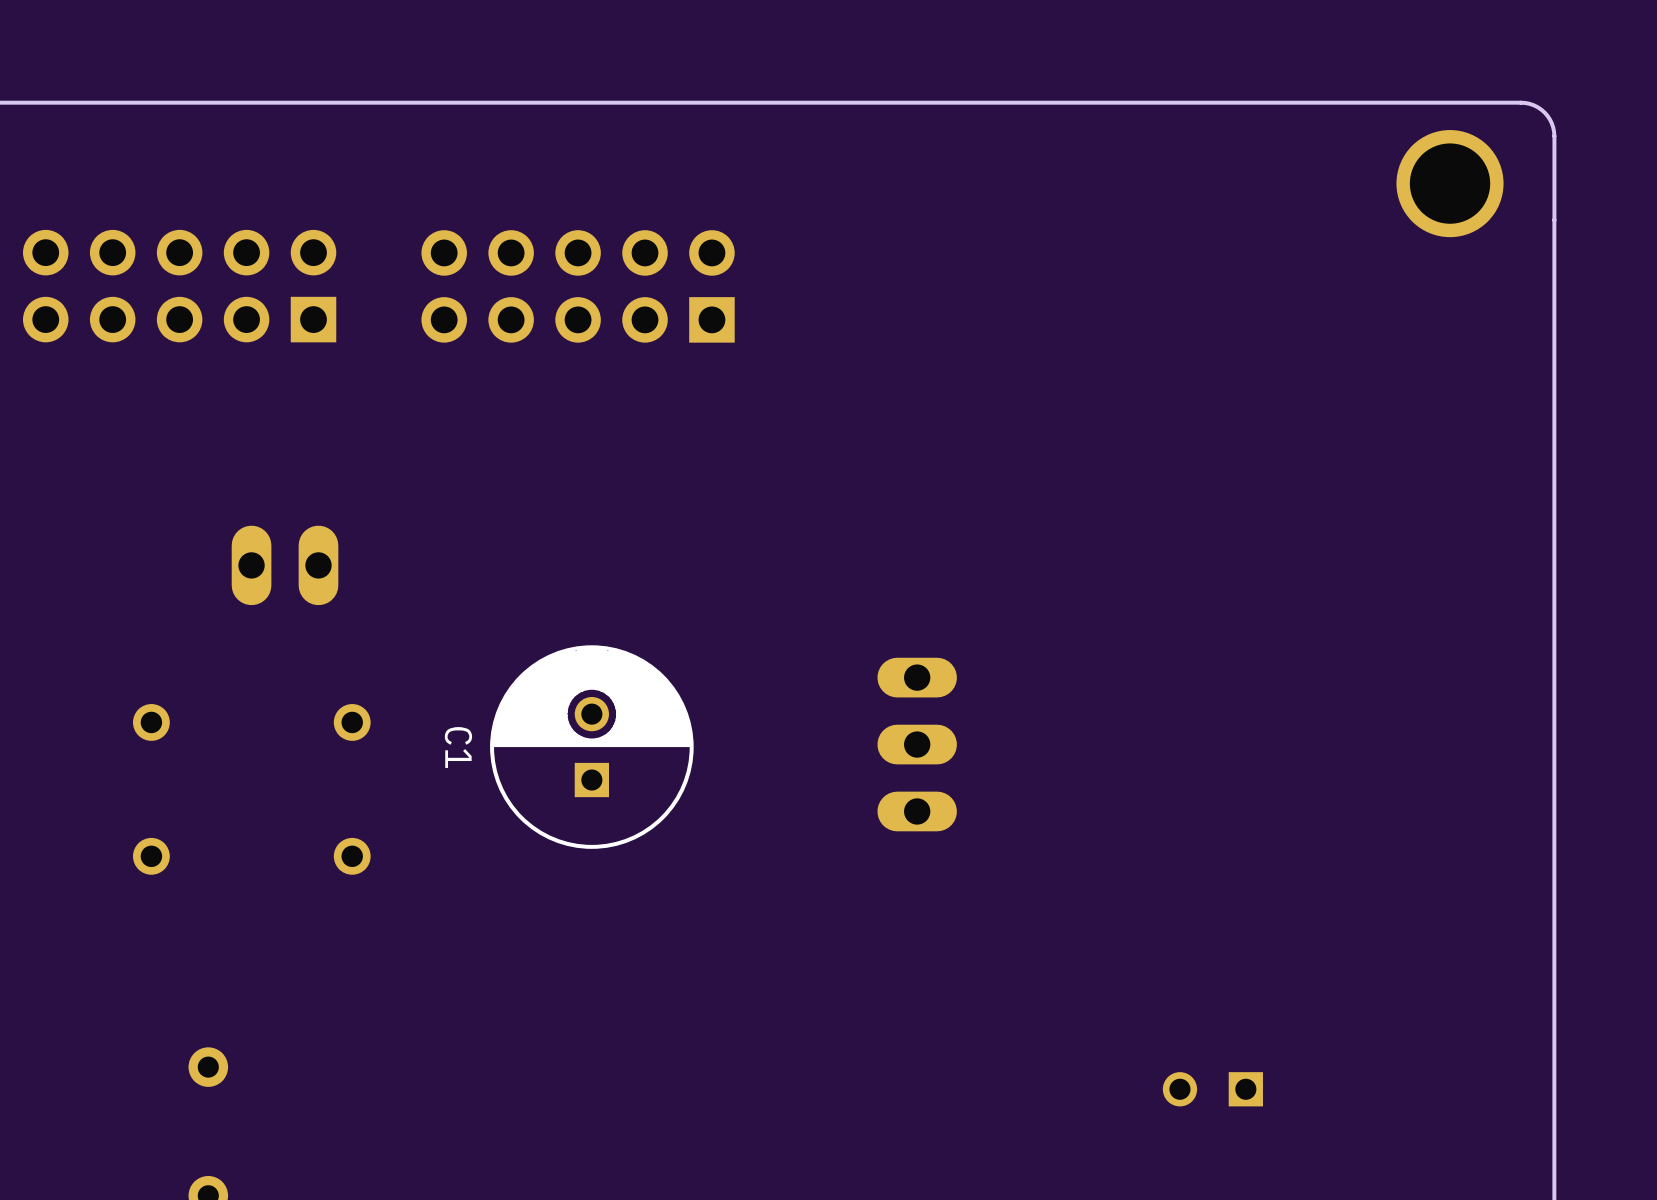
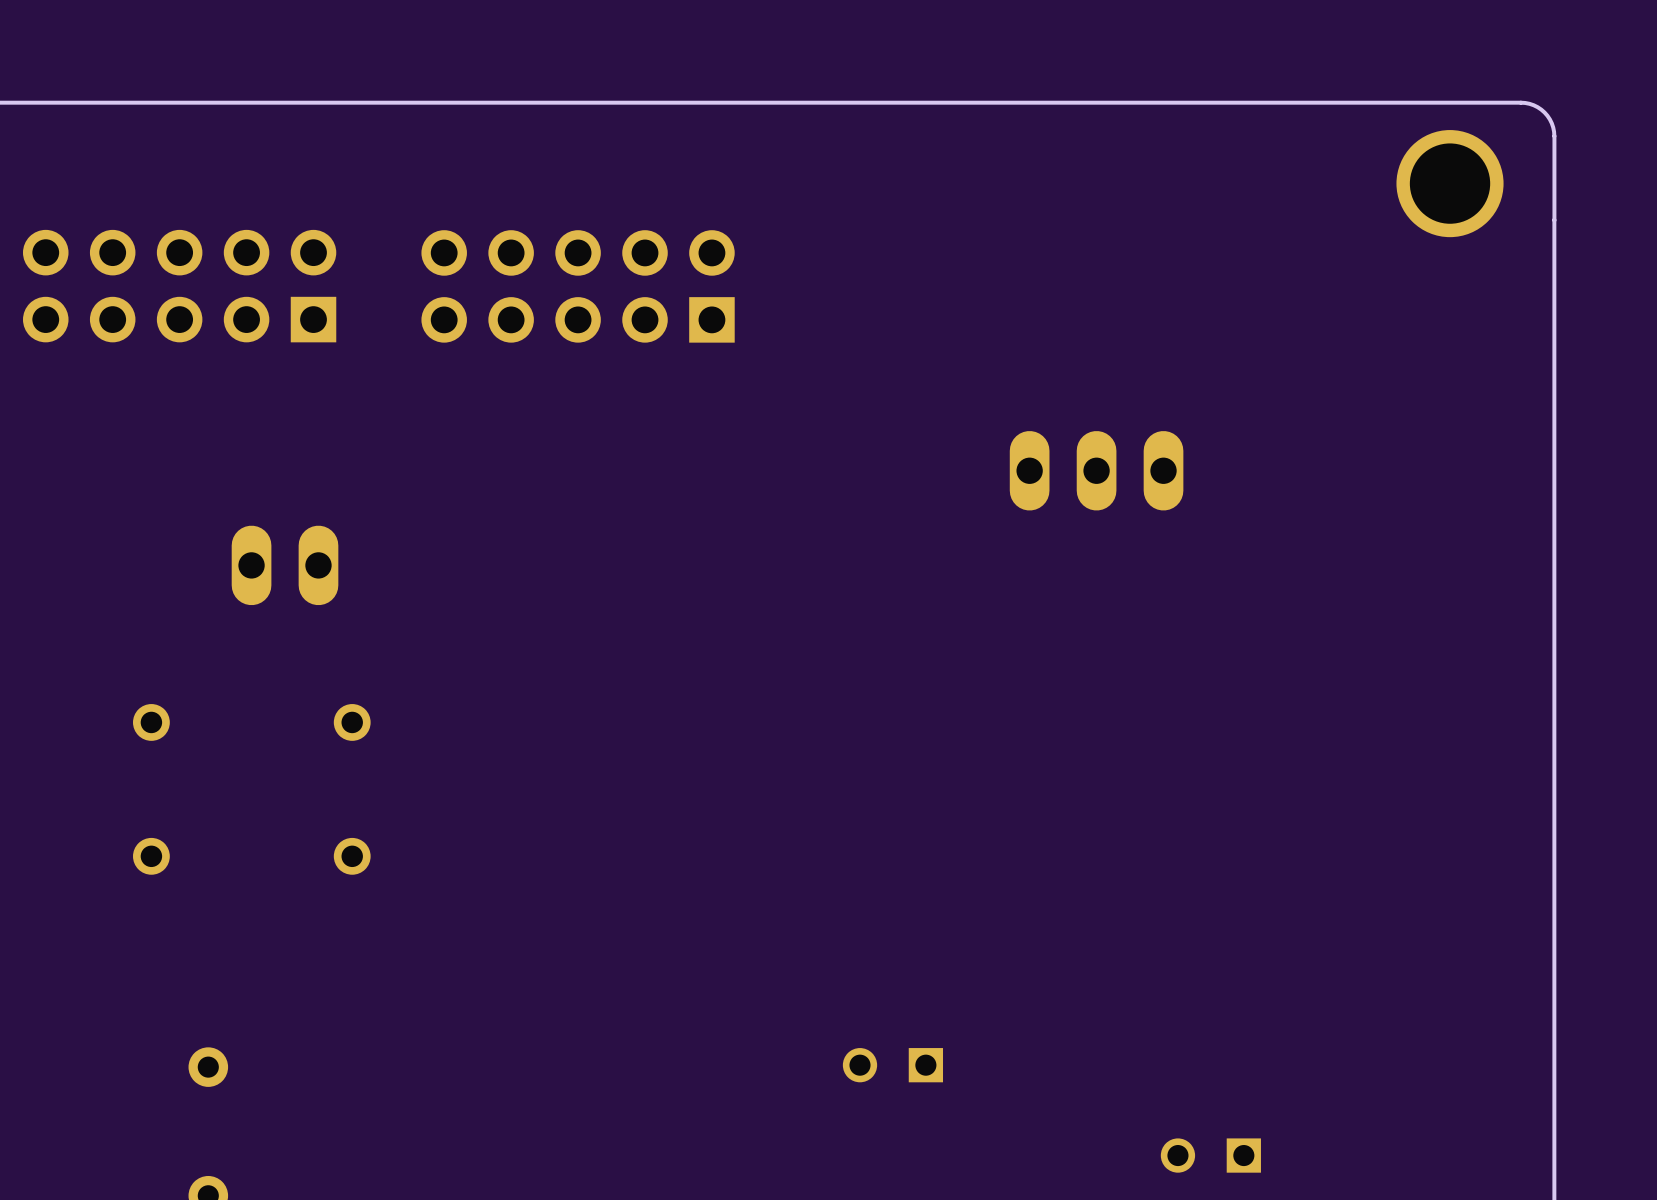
part rotation: 0° (917, 744) -> 90° clockwise (1096, 470)
part position: (917, 744) -> (1096, 470)
C1 side: bottom (591, 747) -> top (892, 1065)
part position: (1212, 1089) -> (1210, 1155)

